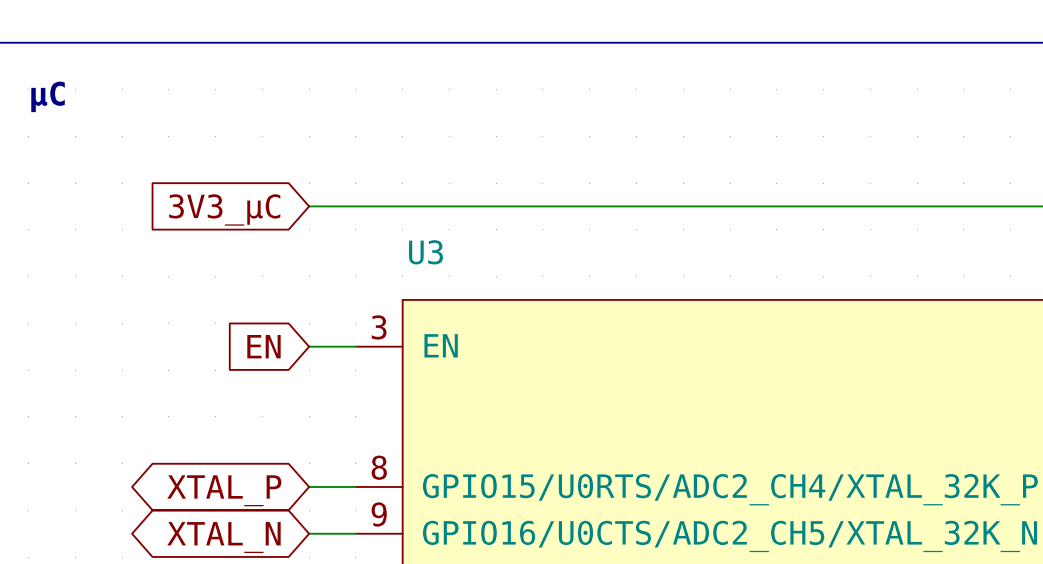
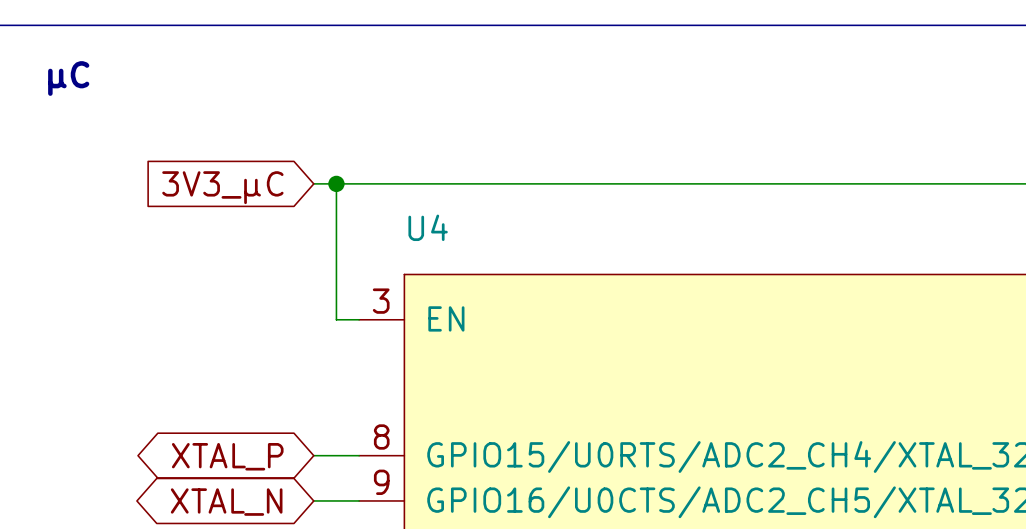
junction: none -> (336, 183)
U3 name: U3 (425, 252) -> U4 (428, 227)
global label: EN (263, 346) -> none
wire: (309, 346) (332, 346) -> (336, 183) (336, 319)

